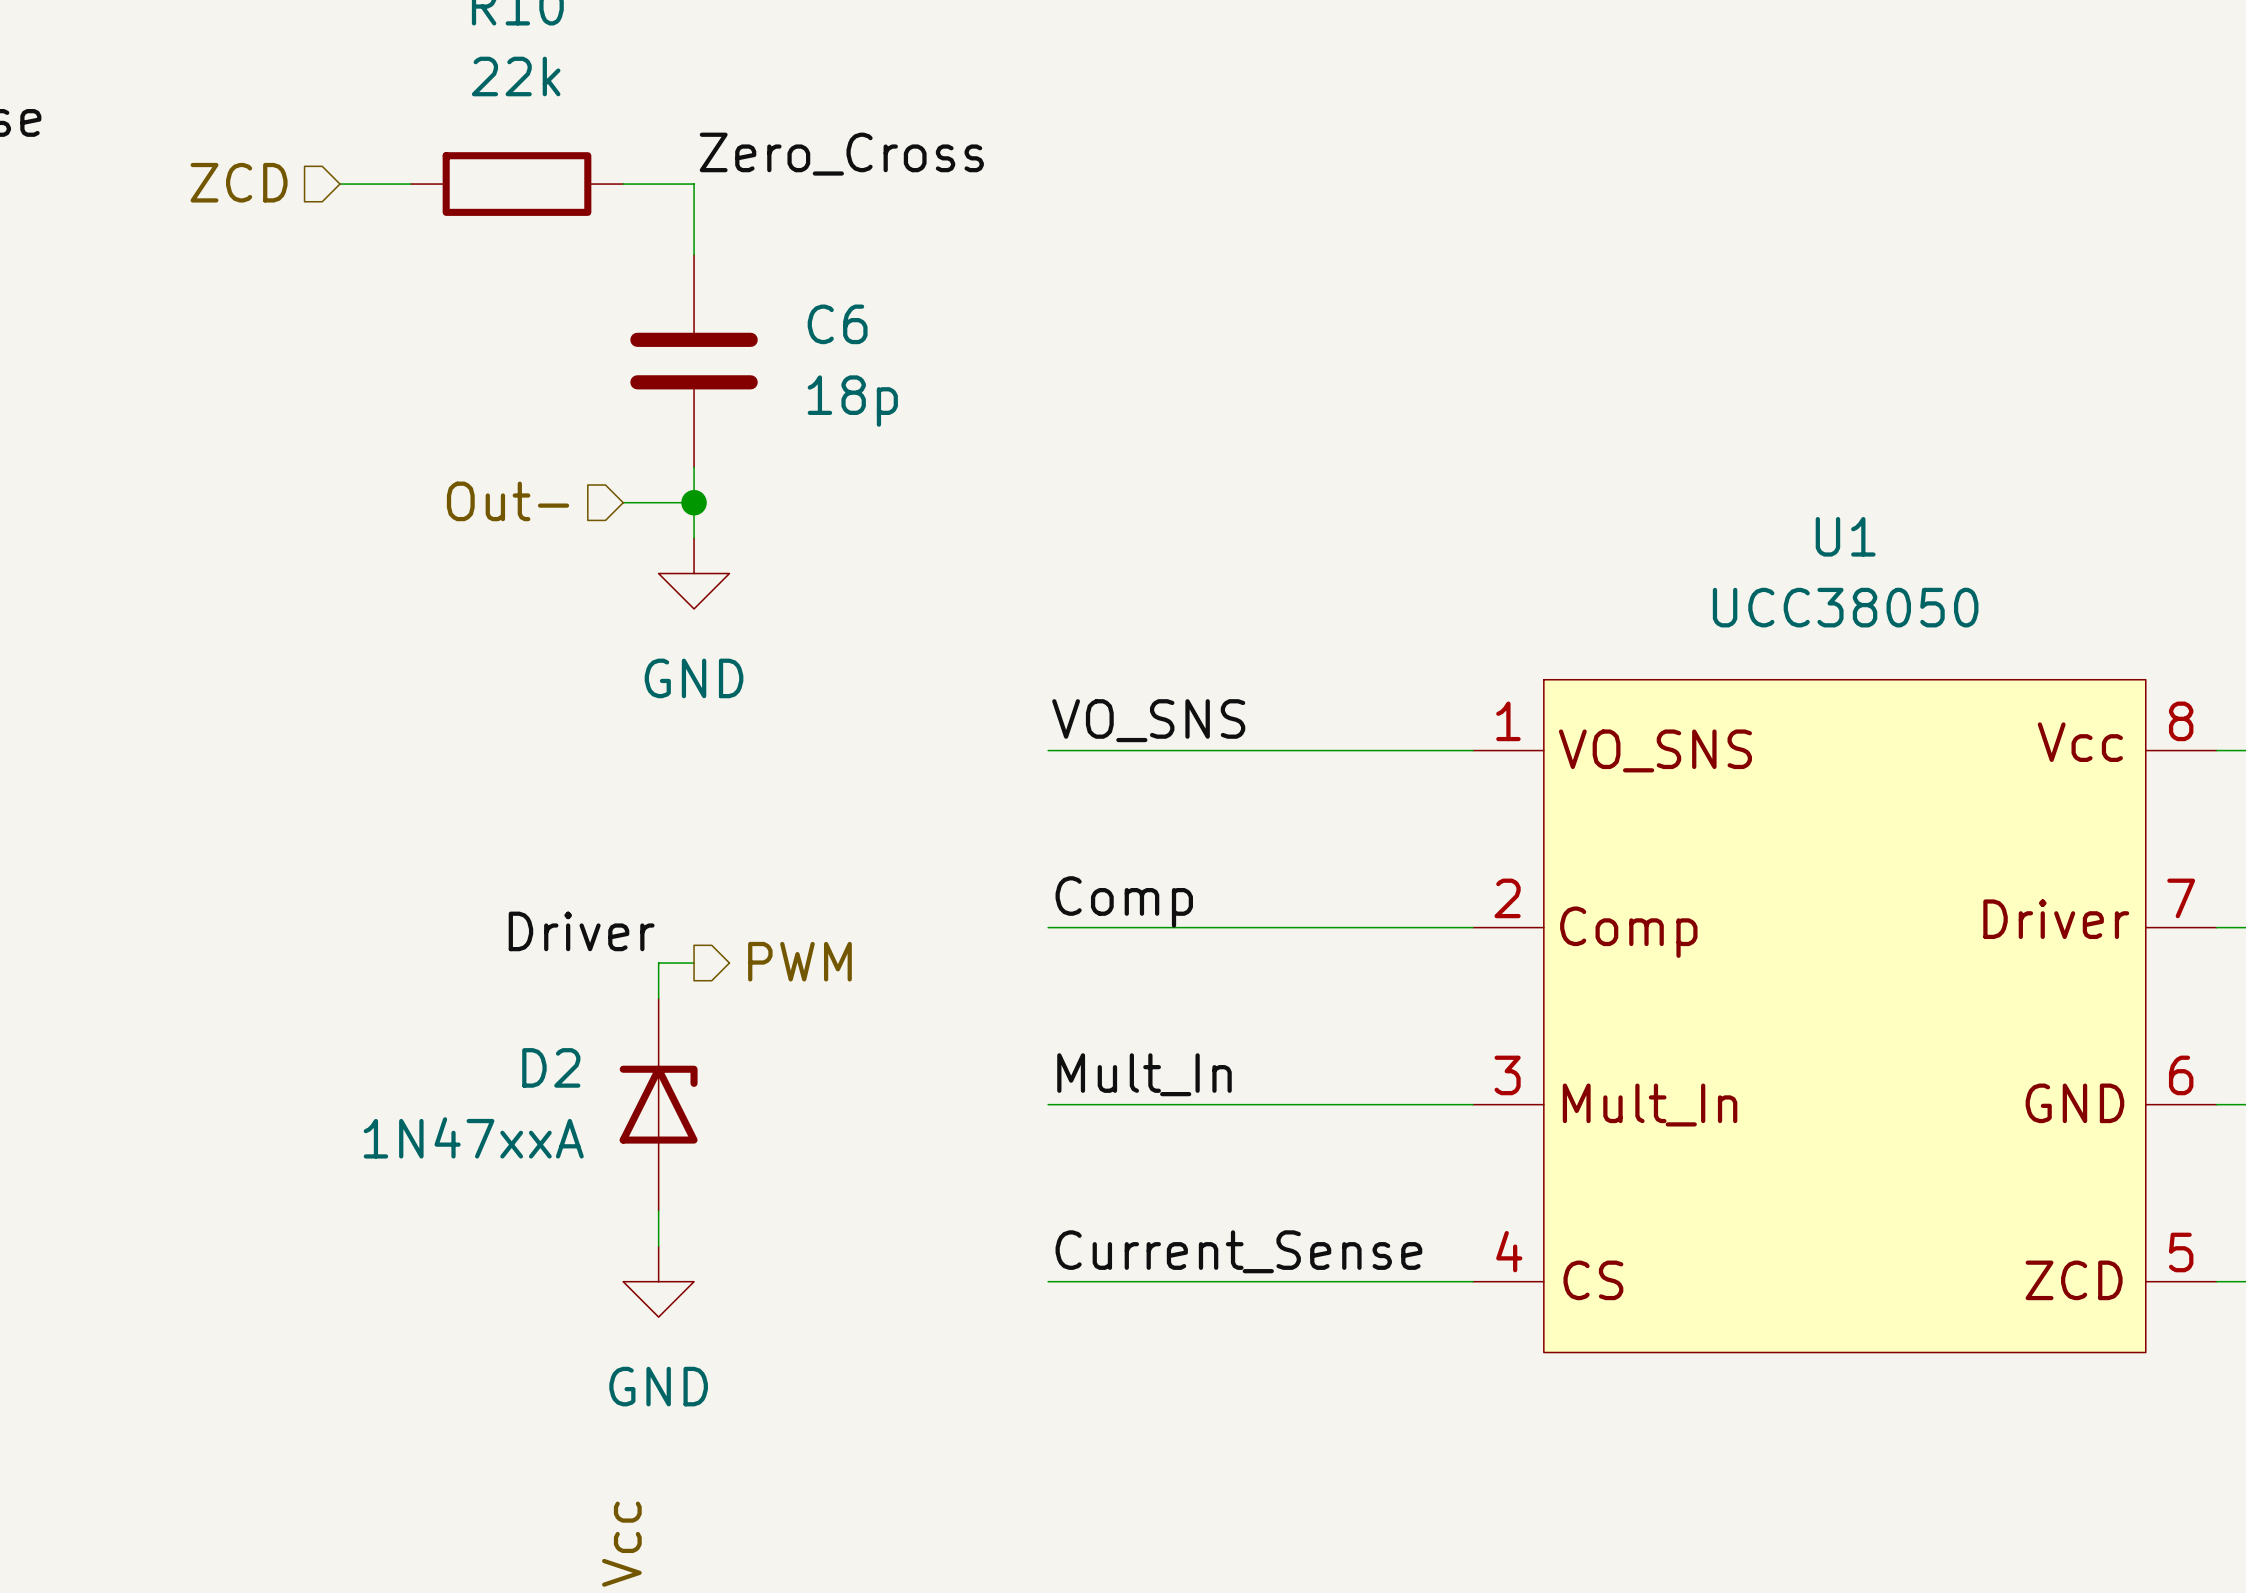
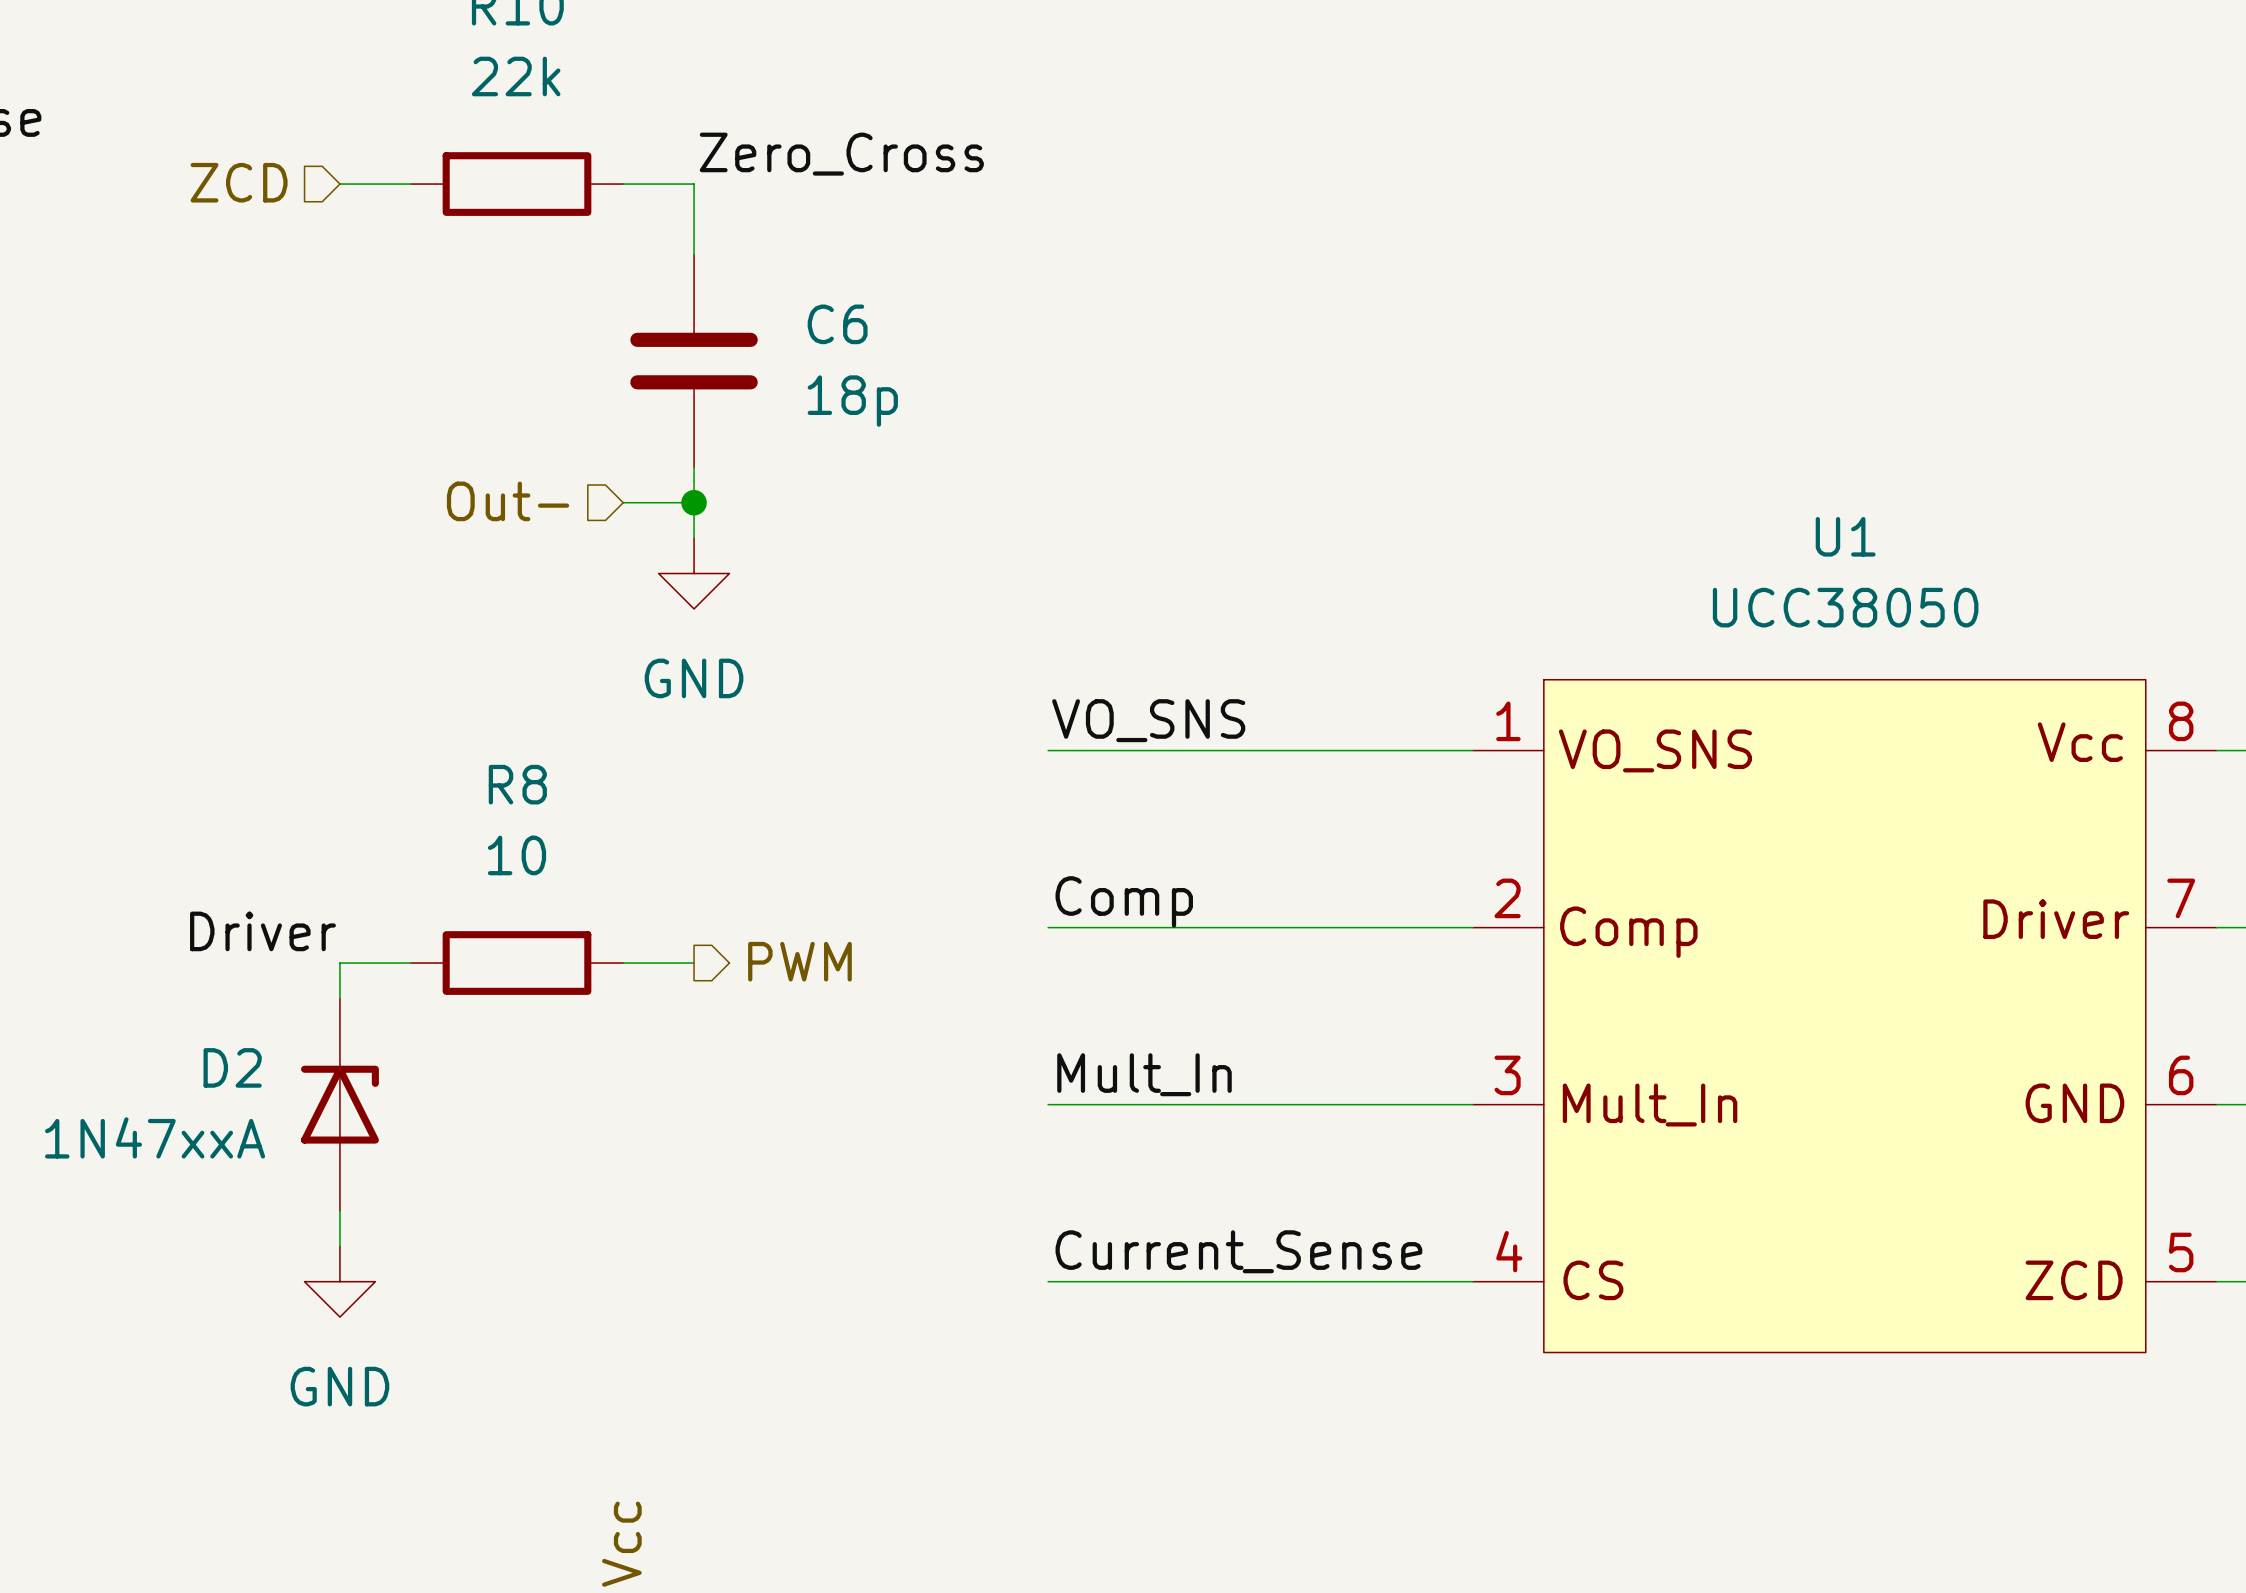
label position: Driver (581, 931) -> Driver (262, 931)
wire: none -> (410, 963) (339, 963) (339, 998)
R8: none -> 10 (517, 963)
wire: (658, 963) (658, 998) -> (658, 963) (623, 963)
D2 position: (658, 1104) -> (339, 1104)
wire: (658, 1210) (658, 1246) -> (339, 1210) (339, 1246)
power symbol position: GND (658, 1281) -> GND (339, 1281)

